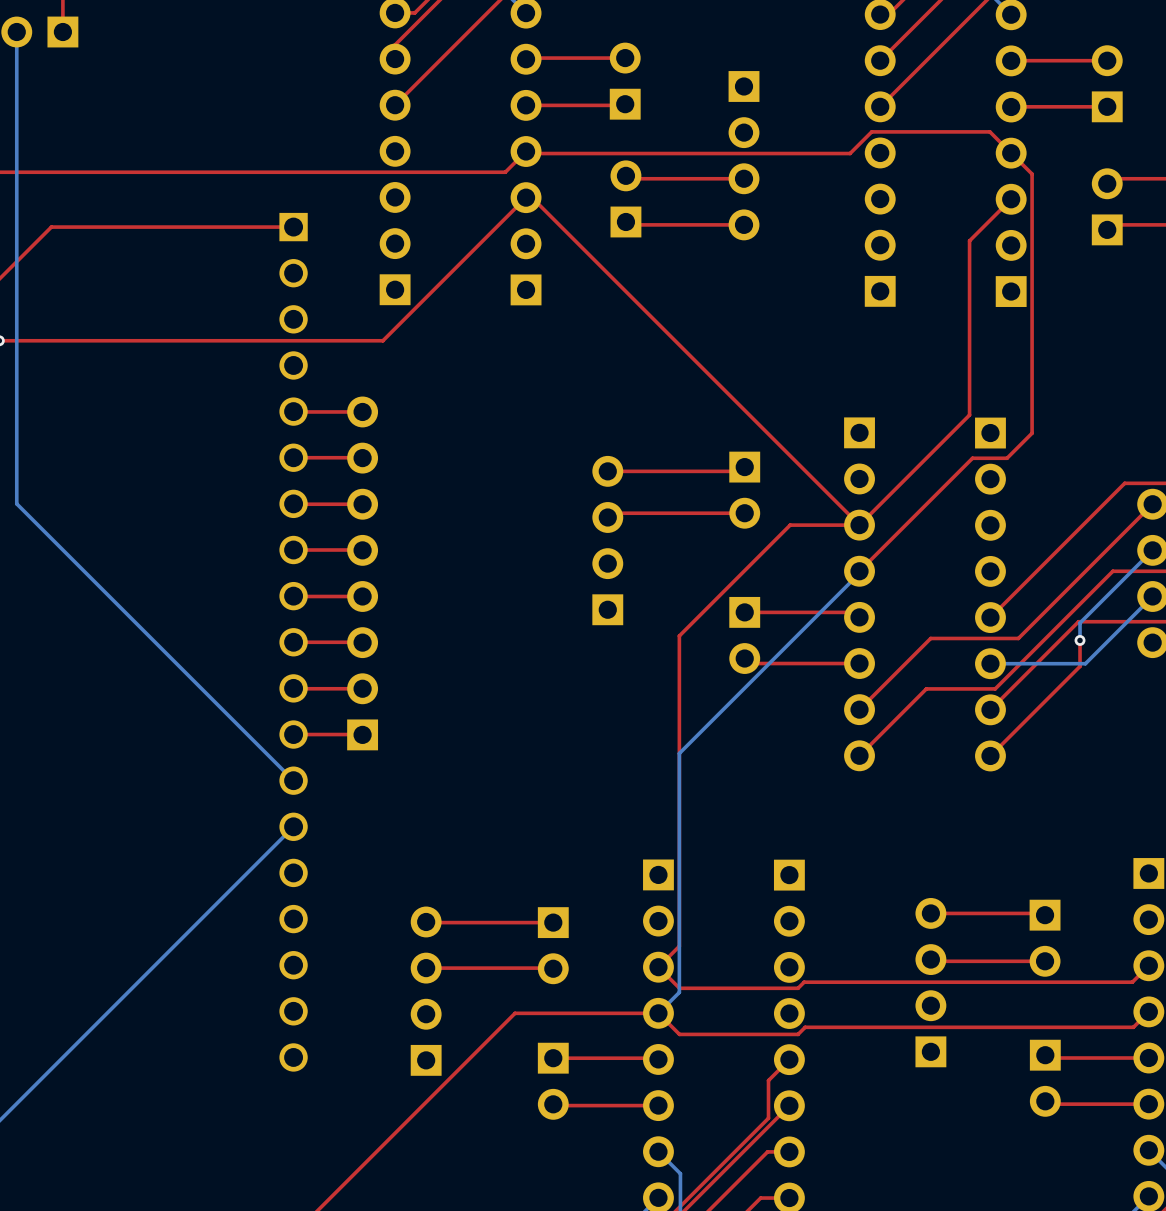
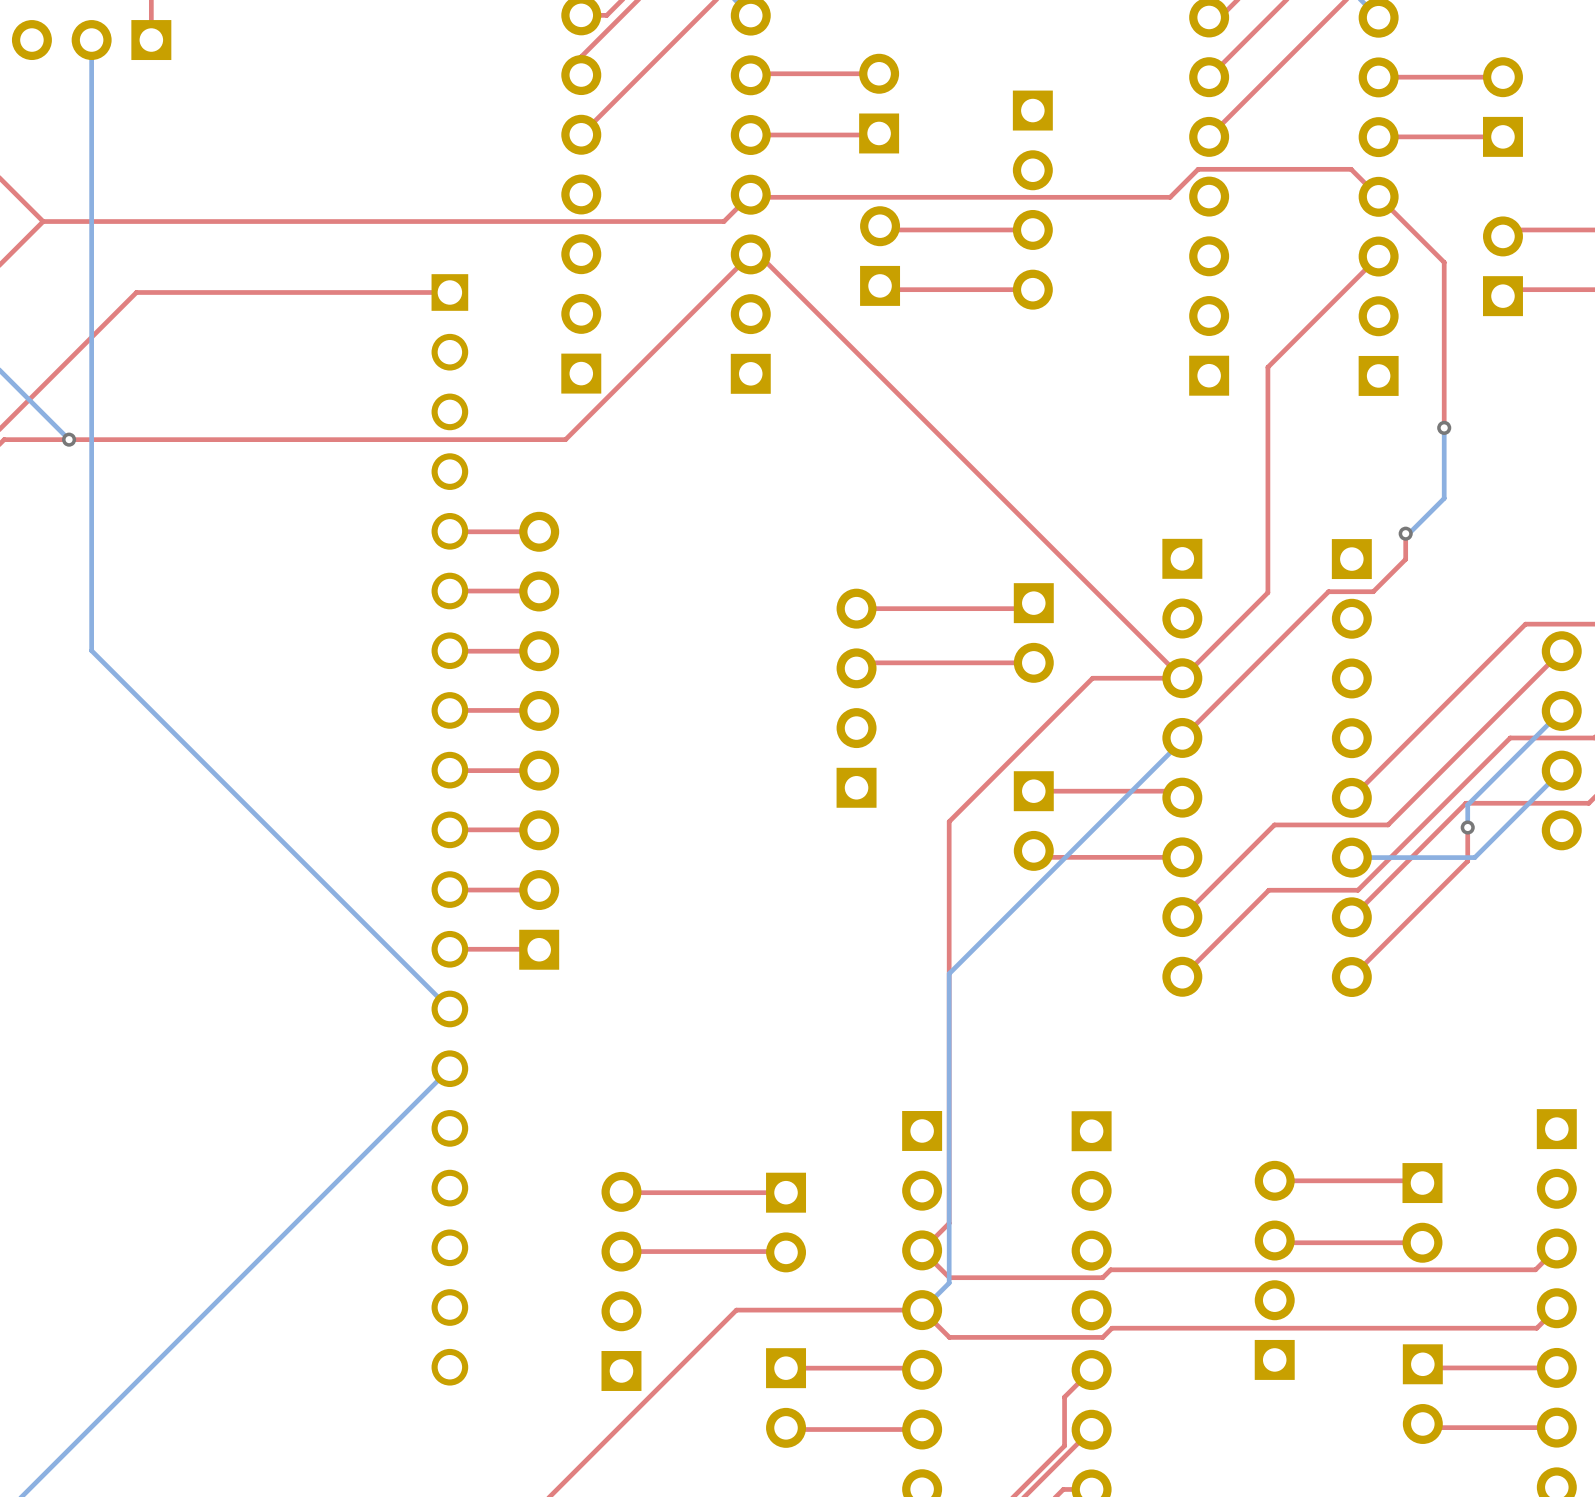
top track: (1032, 174) (1032, 413) -> (1405, 223) (1444, 262) (1444, 427)
top track: (969, 240) (969, 415) (925, 459) -> (1324, 310) (1267, 367) (1267, 592)
bottom track: none -> (1444, 427) (1444, 498) (1408, 533) (1405, 533)
via: none -> (1444, 427)
via: none -> (1405, 533)

